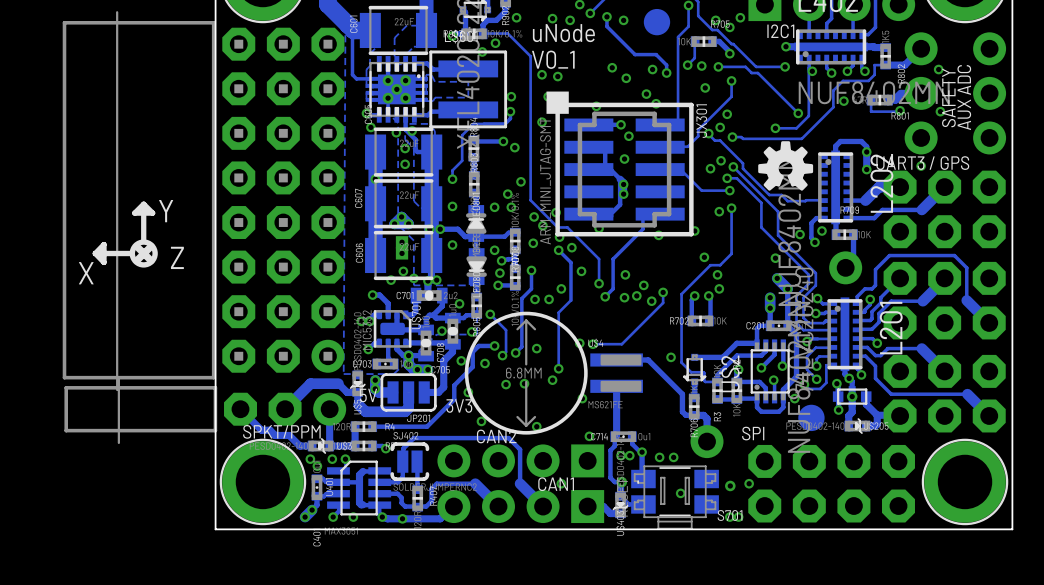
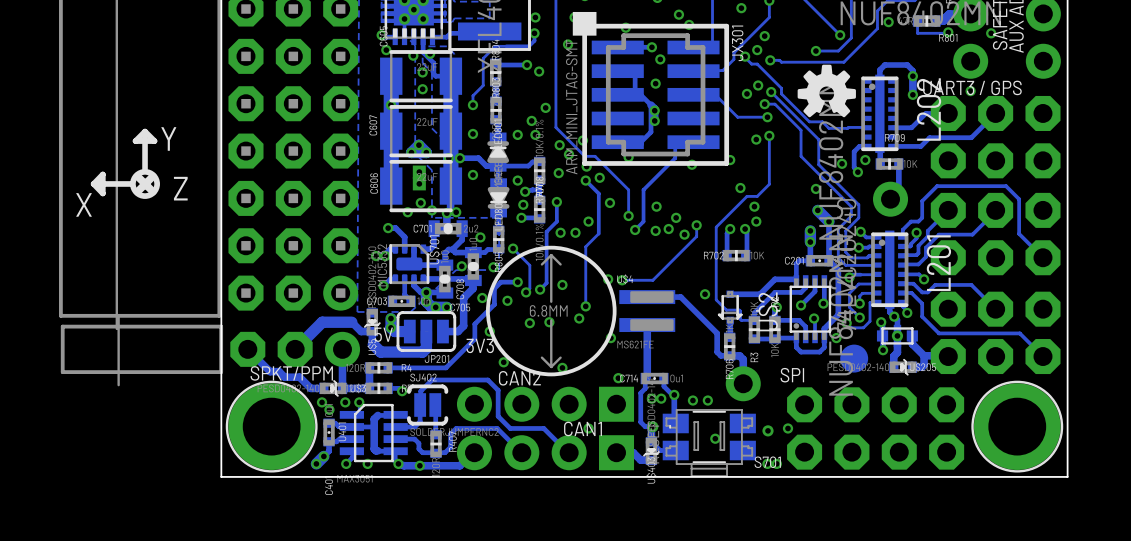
track width: thick (900, 187) (879, 187) (865, 200) -> thin (948, 113) (925, 113) (911, 127)
track width: thick (944, 187) (921, 209) -> thin (995, 113) (971, 137)
track width: thick (944, 278) (922, 301) -> thin (995, 210) (972, 234)
track width: thick (966, 300) (989, 322) -> thin (1019, 233) (1042, 257)
track width: thick (921, 348) (944, 371) -> thin (971, 284) (995, 309)
track width: thick (967, 394) (989, 415) -> thin (1019, 333) (1042, 356)
track: (466, 438) (508, 438) (520, 449) (520, 483) (542, 506) -> (487, 380) (498, 390) (498, 416) (510, 428) (543, 428) (569, 452)
track width: thick (475, 483) (498, 506) -> thin (497, 428) (521, 452)

